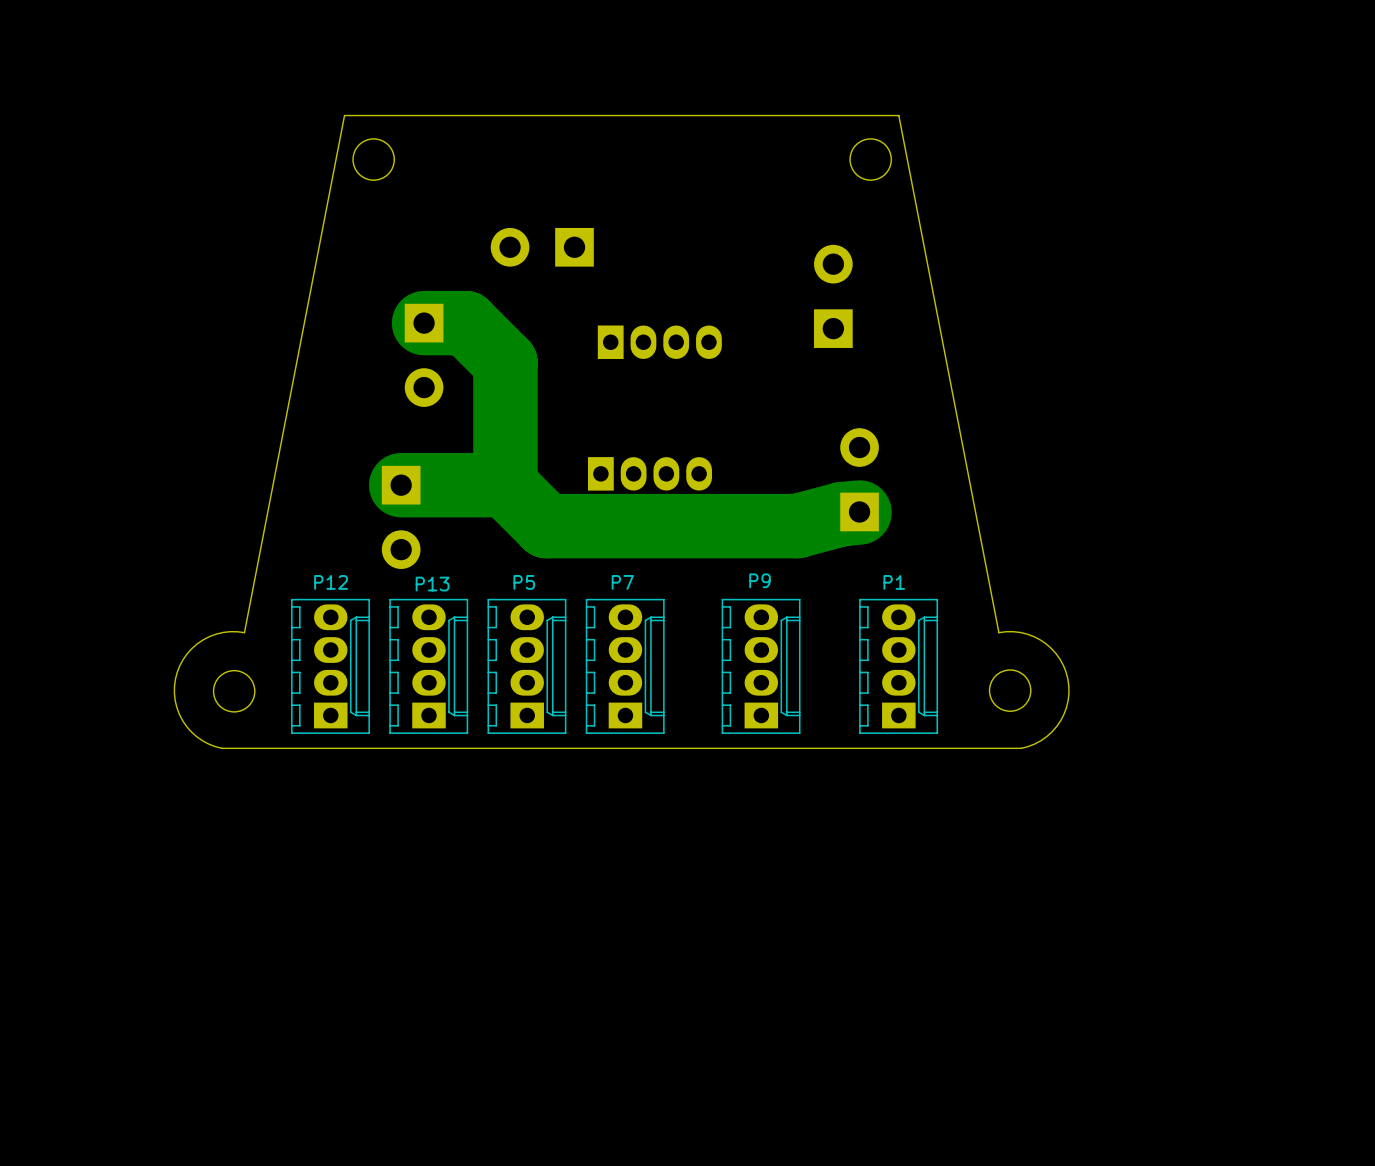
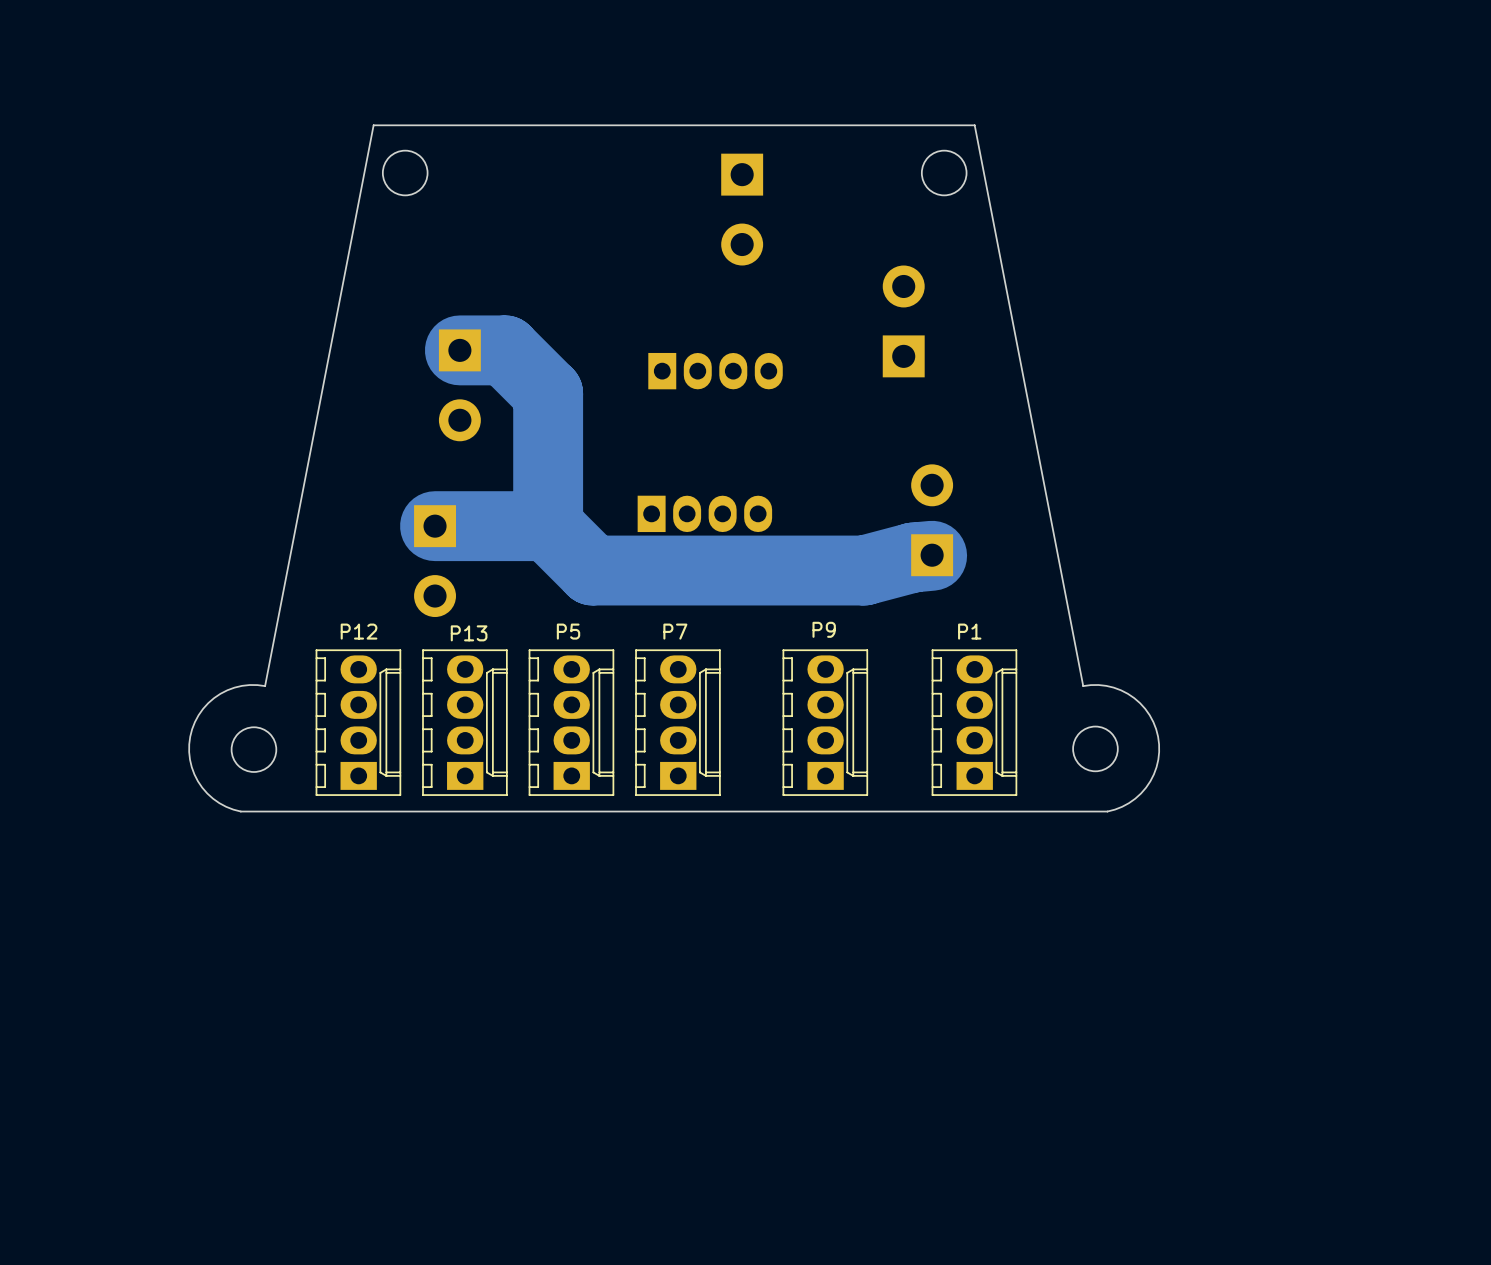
part rotation: 0° (542, 247) -> 90° counterclockwise (742, 209)
part position: (542, 247) -> (742, 209)

